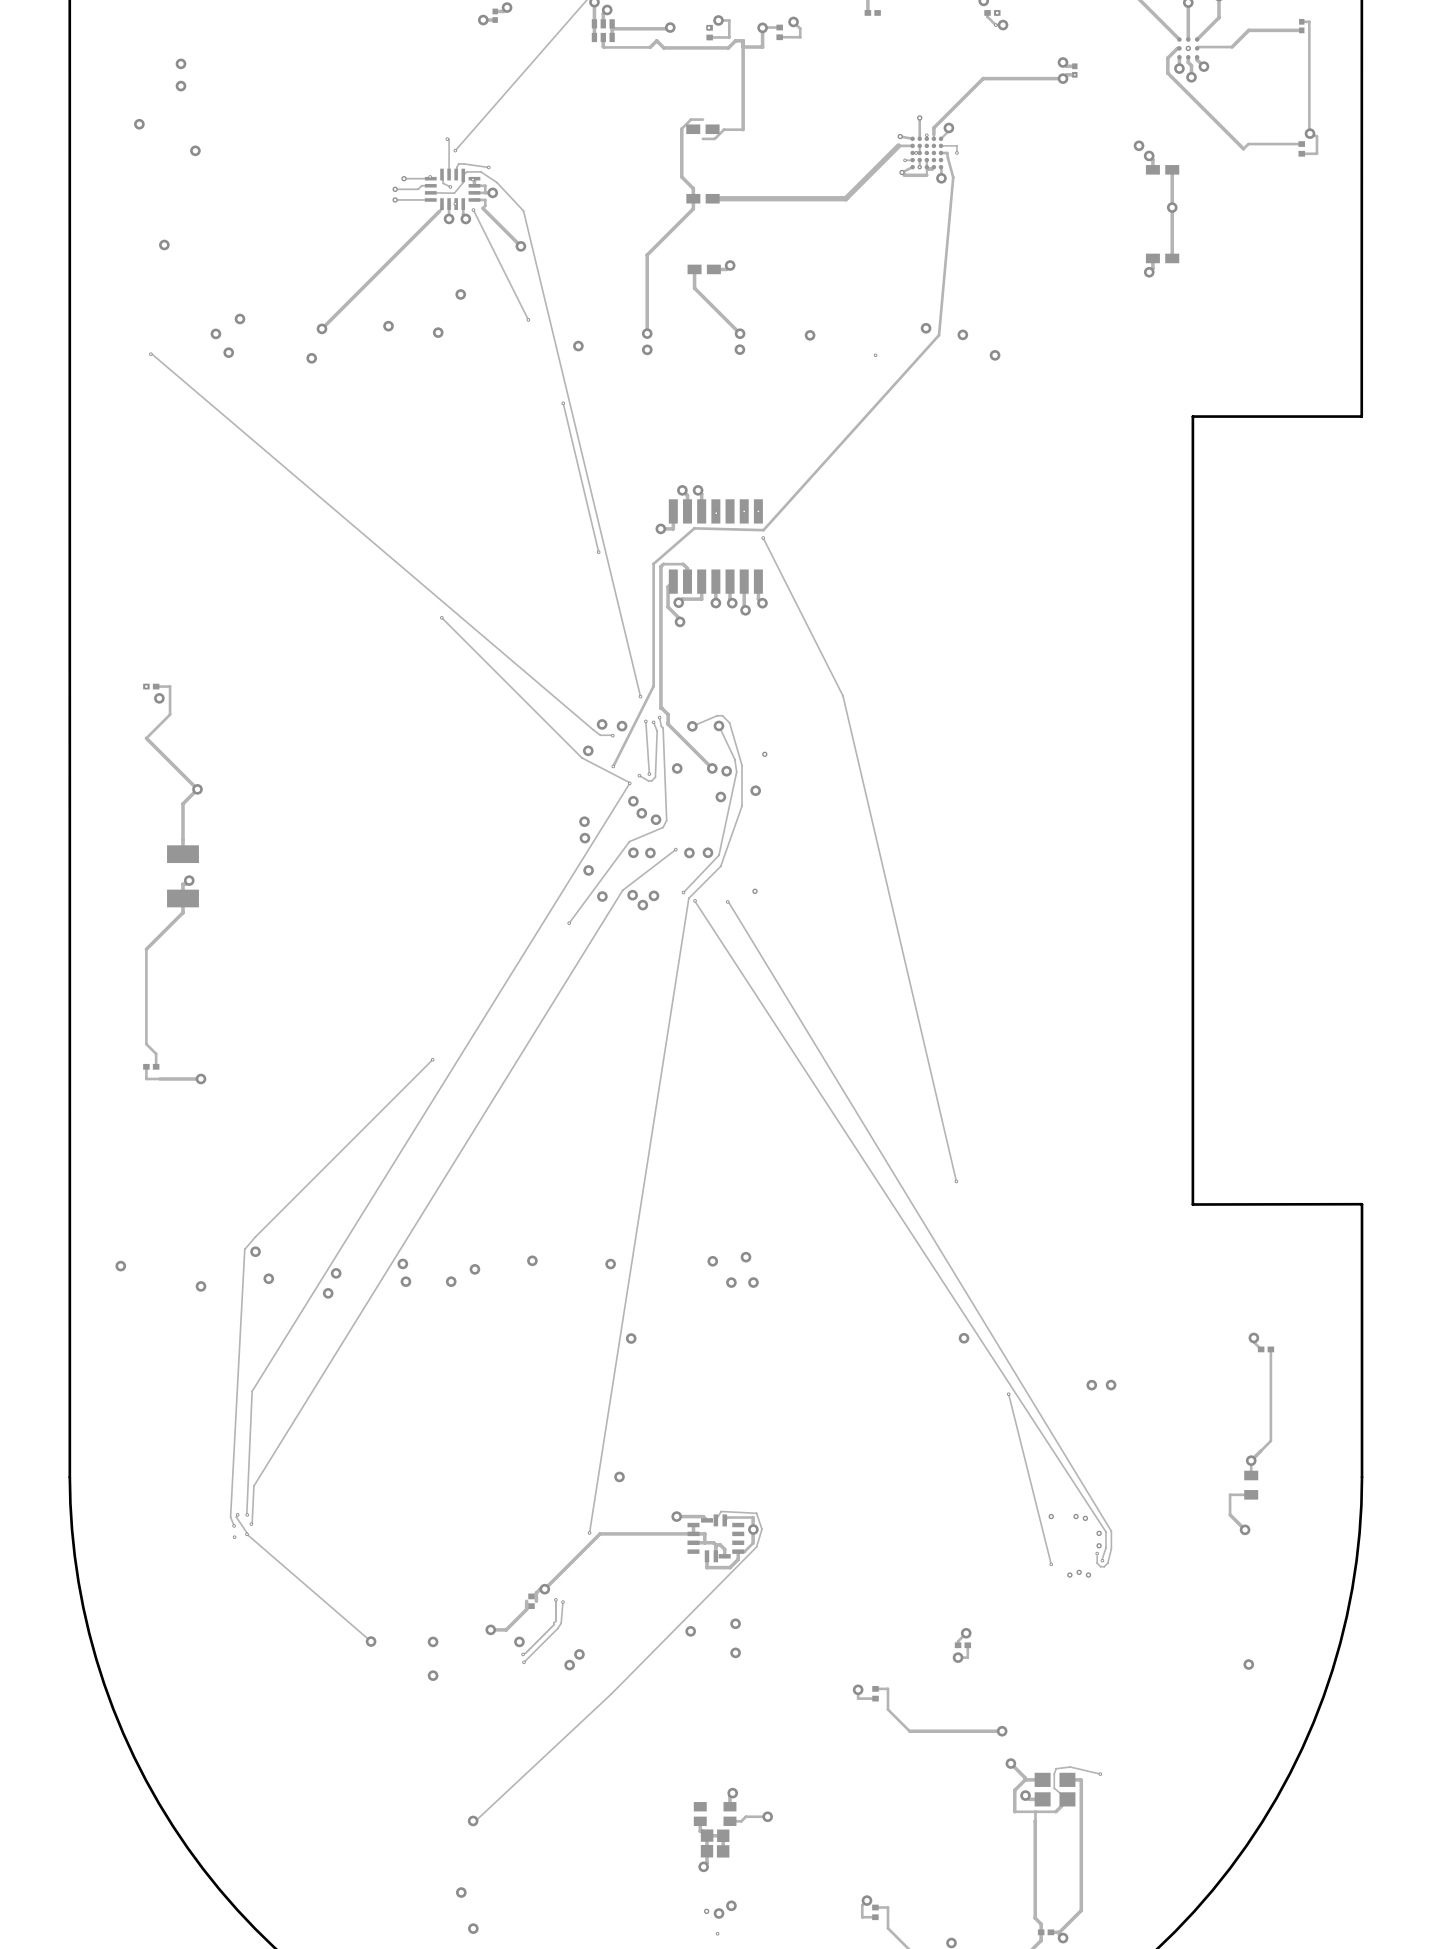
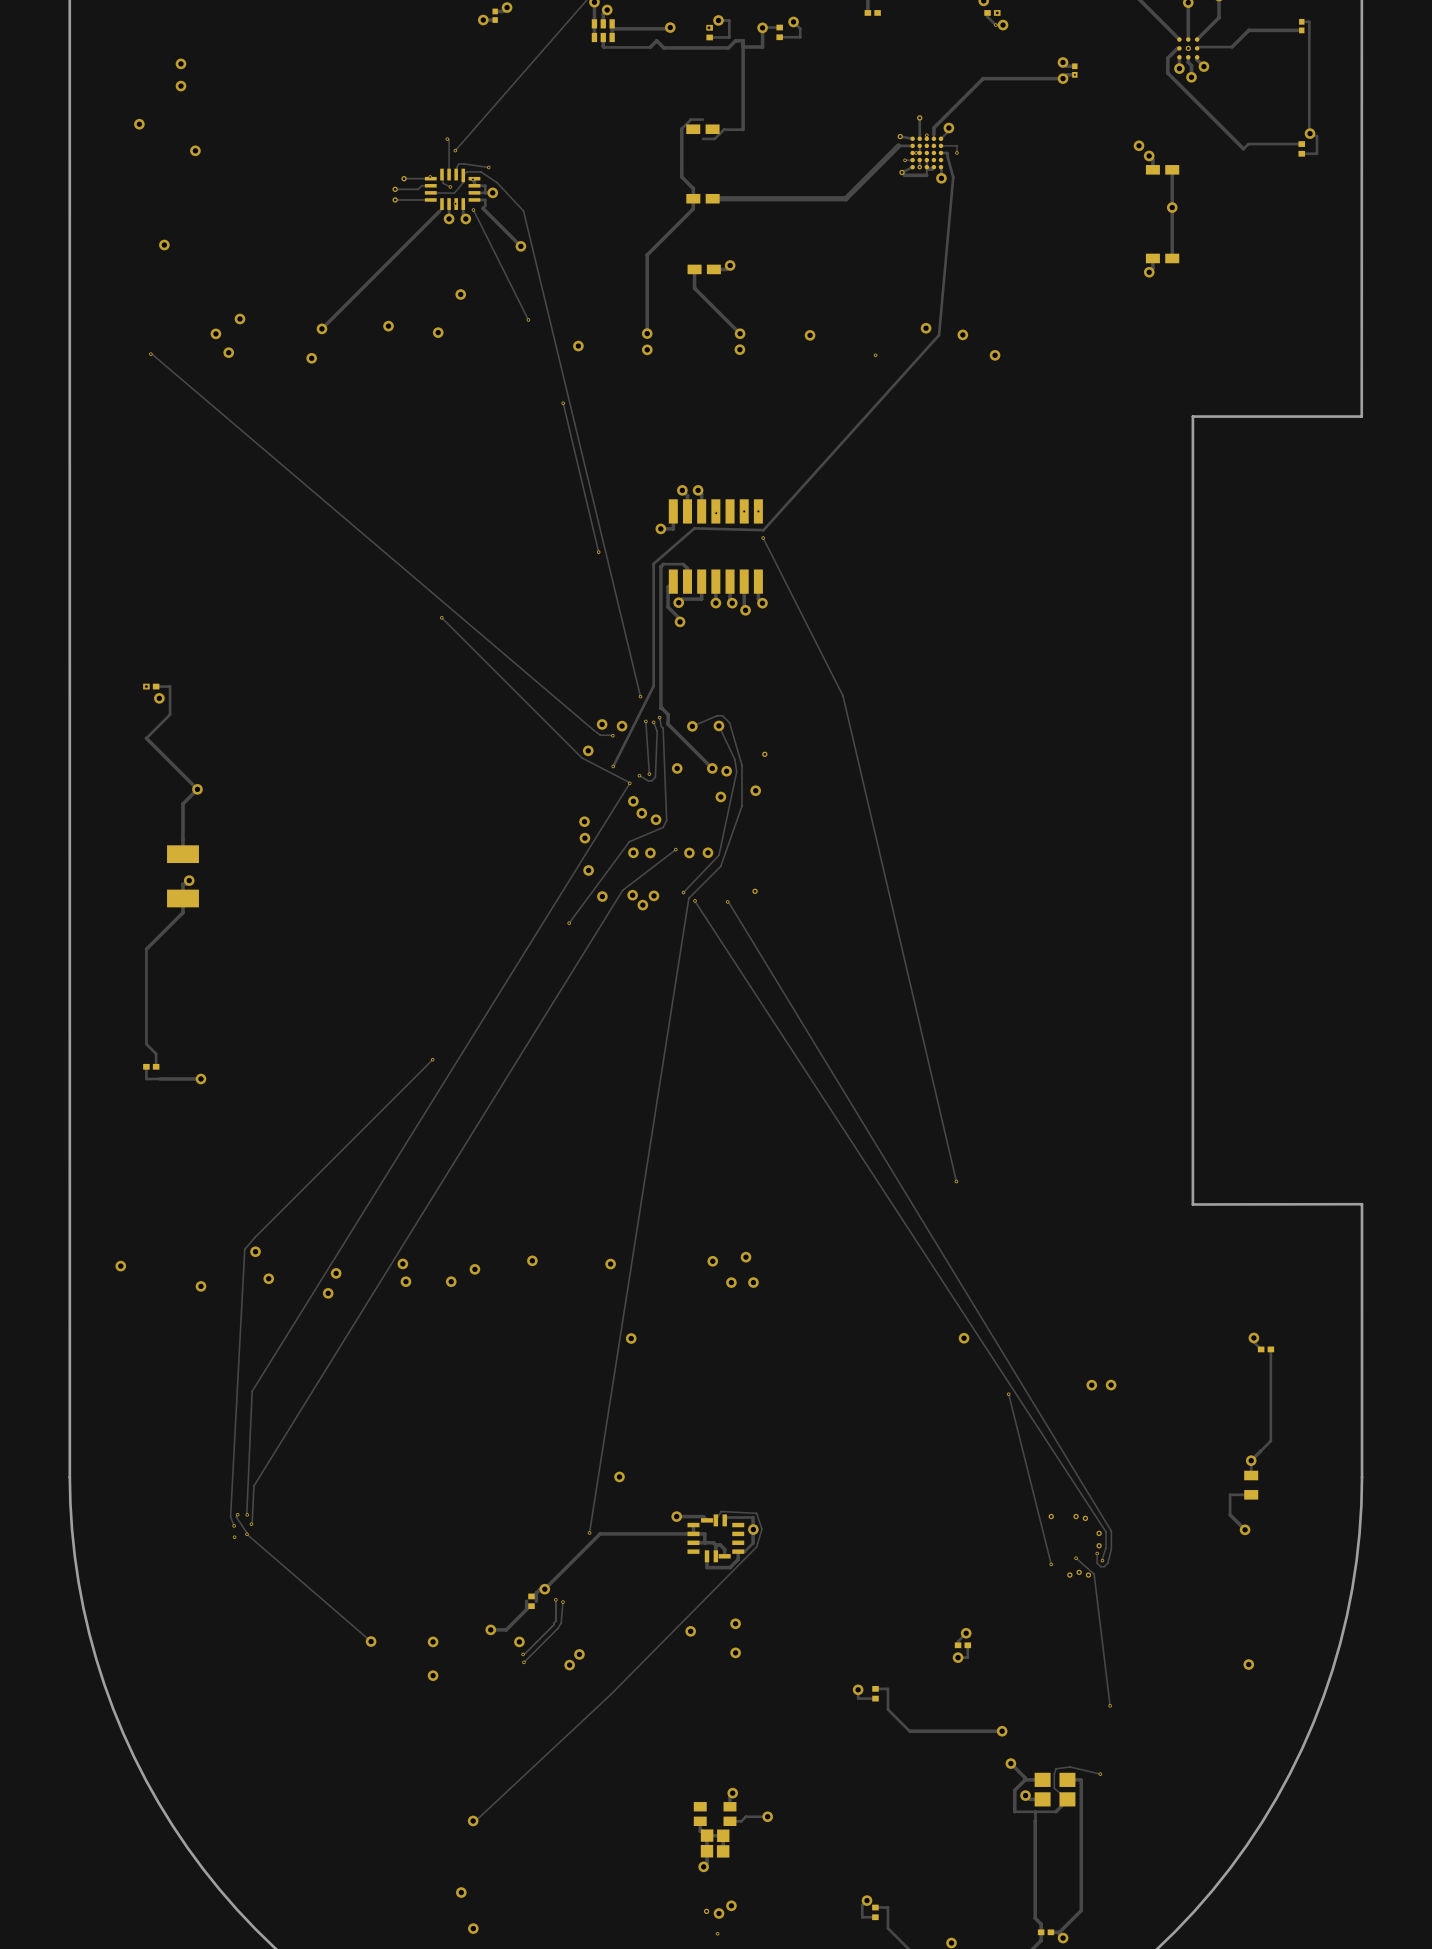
track: none -> (1076, 1558) (1094, 1574) (1110, 1705)
via: none -> (1076, 1558)
via: none -> (1110, 1705)

